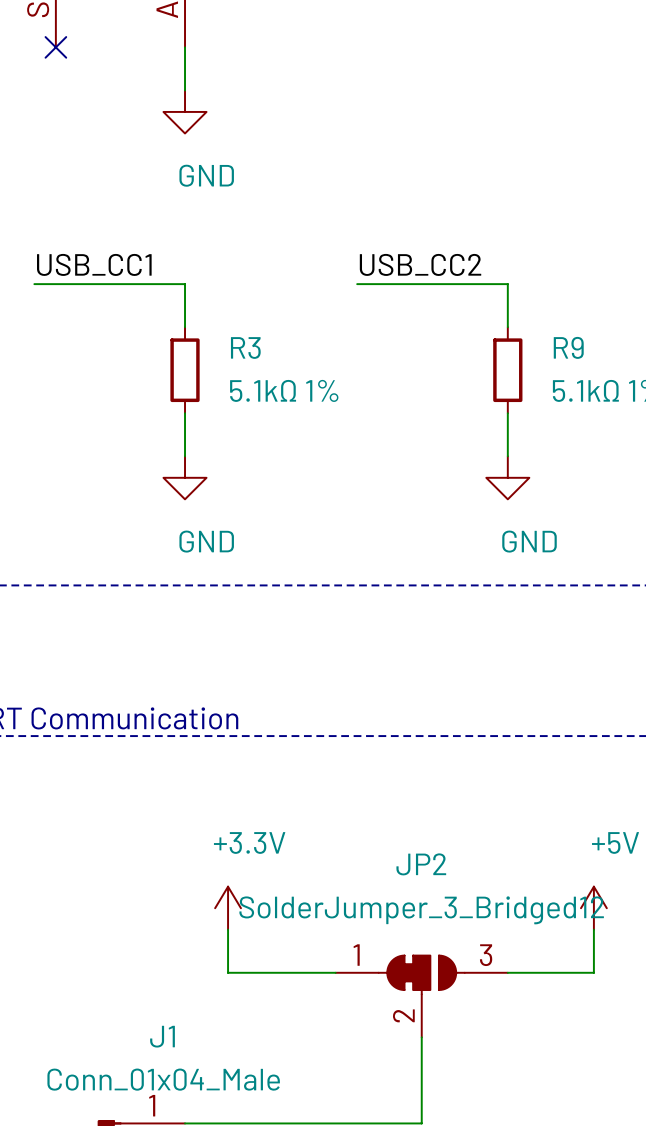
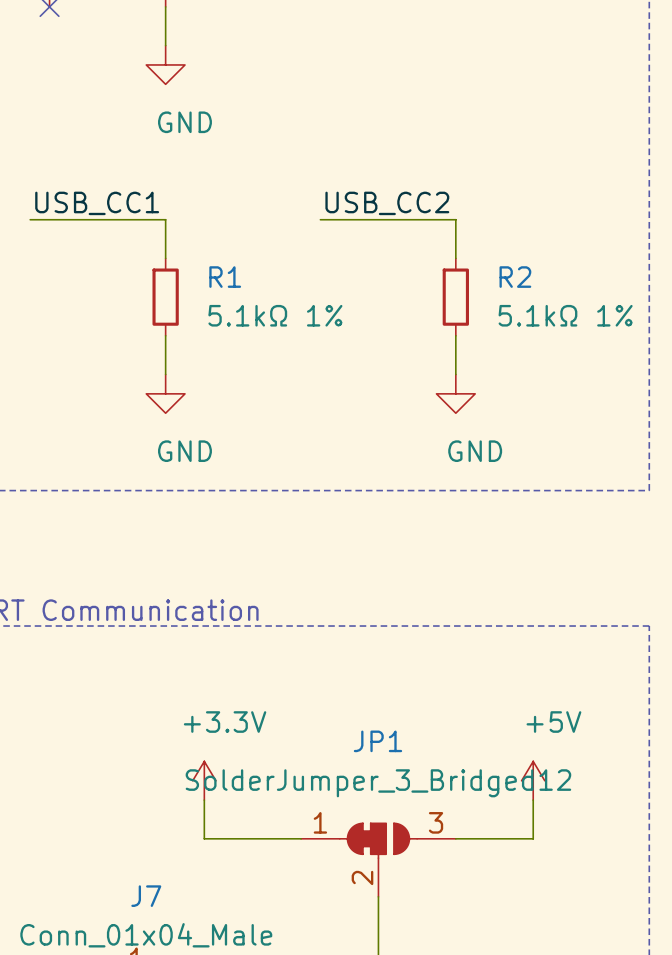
R9 name: R9 (568, 347) -> R2 (515, 277)
R3 name: R3 (245, 348) -> R1 (225, 277)
JP2 name: JP2 (421, 864) -> JP1 (377, 741)
J1 name: J1 (162, 1036) -> J7 (146, 896)

